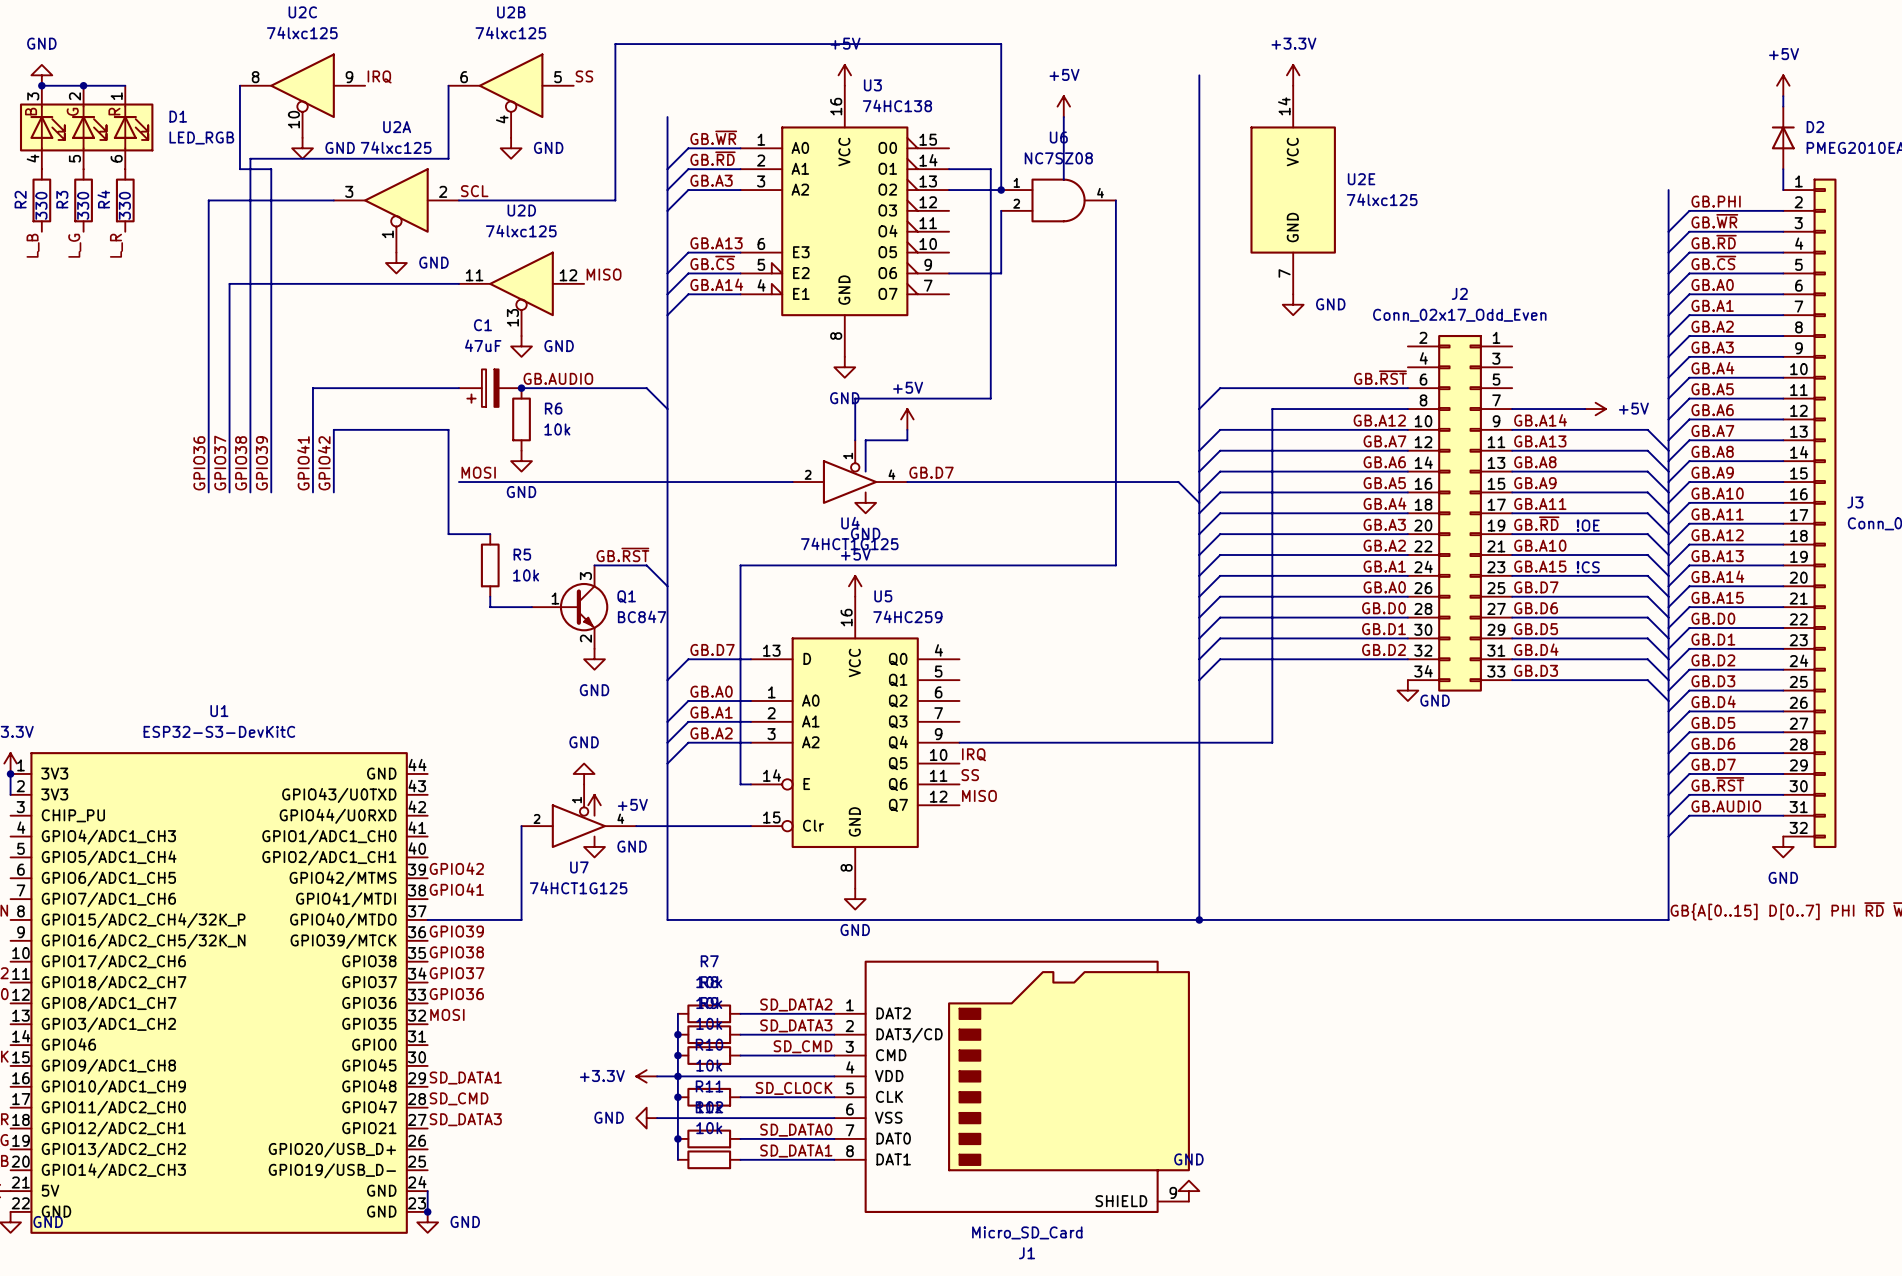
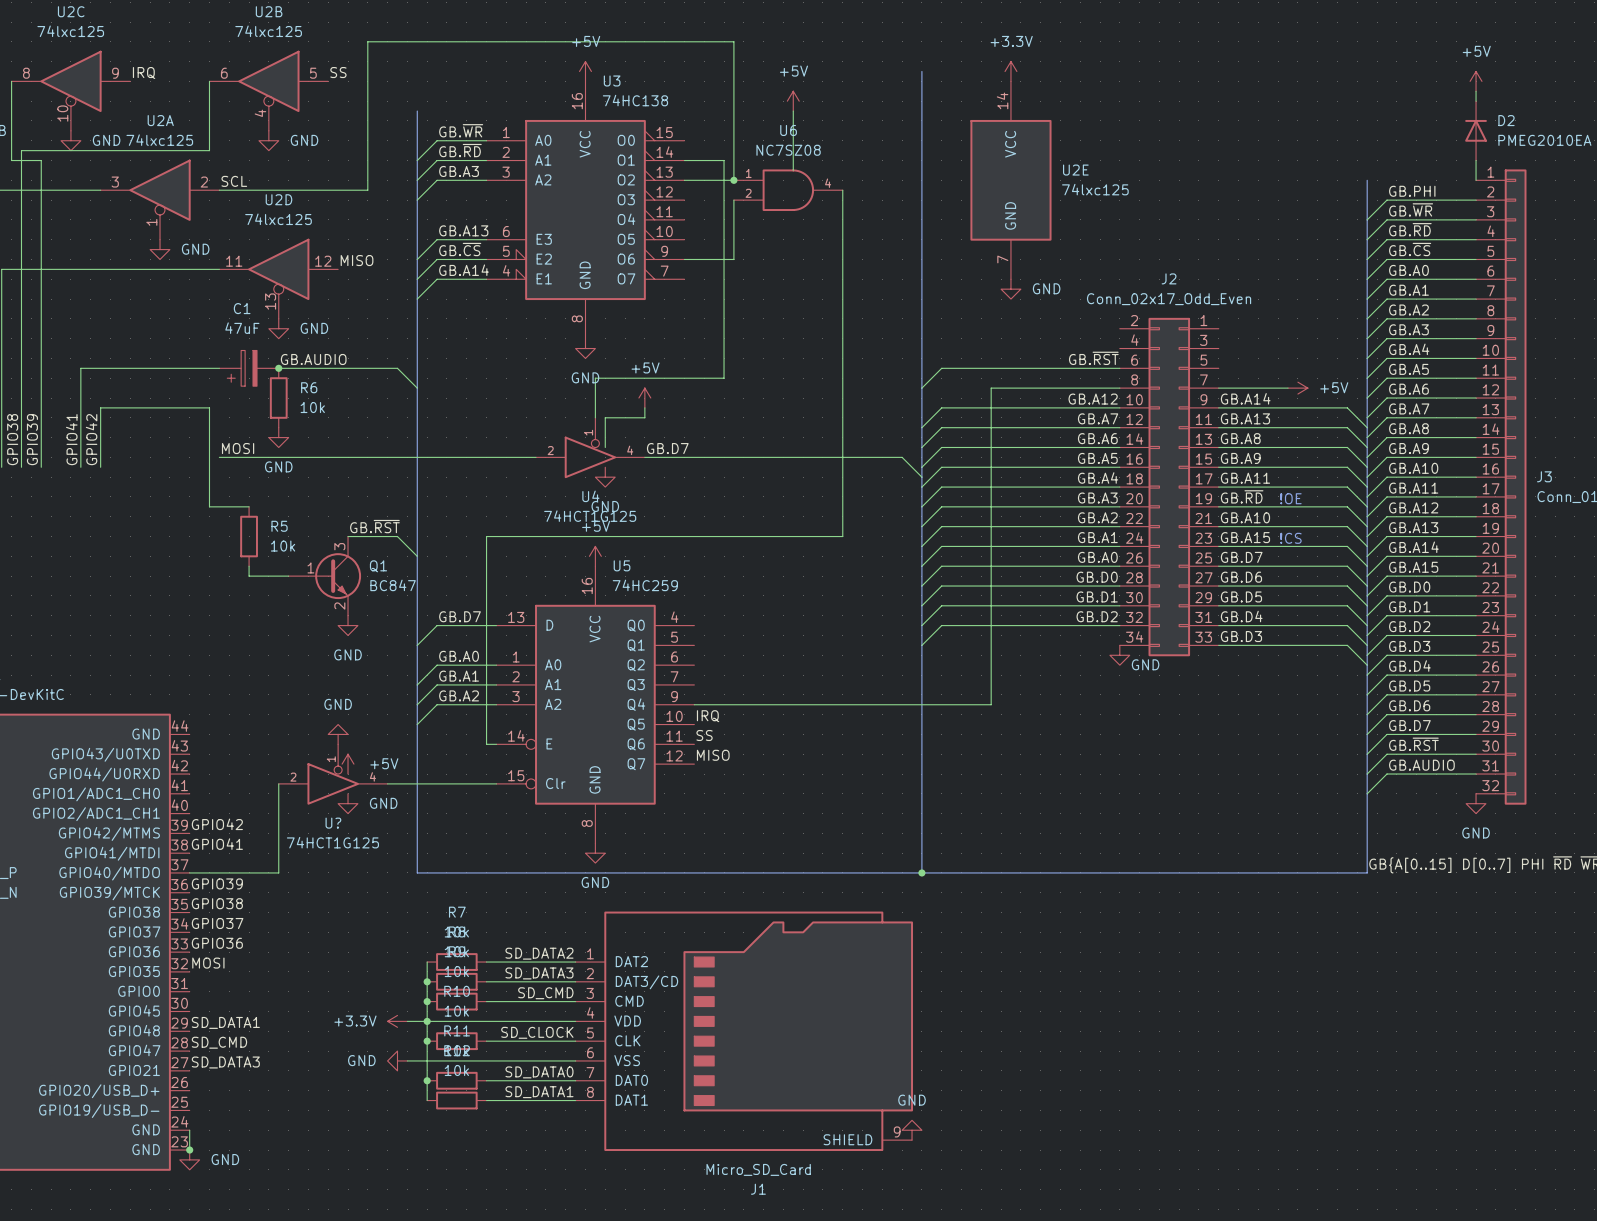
U7 name: U7 (579, 867) -> U? (333, 823)

